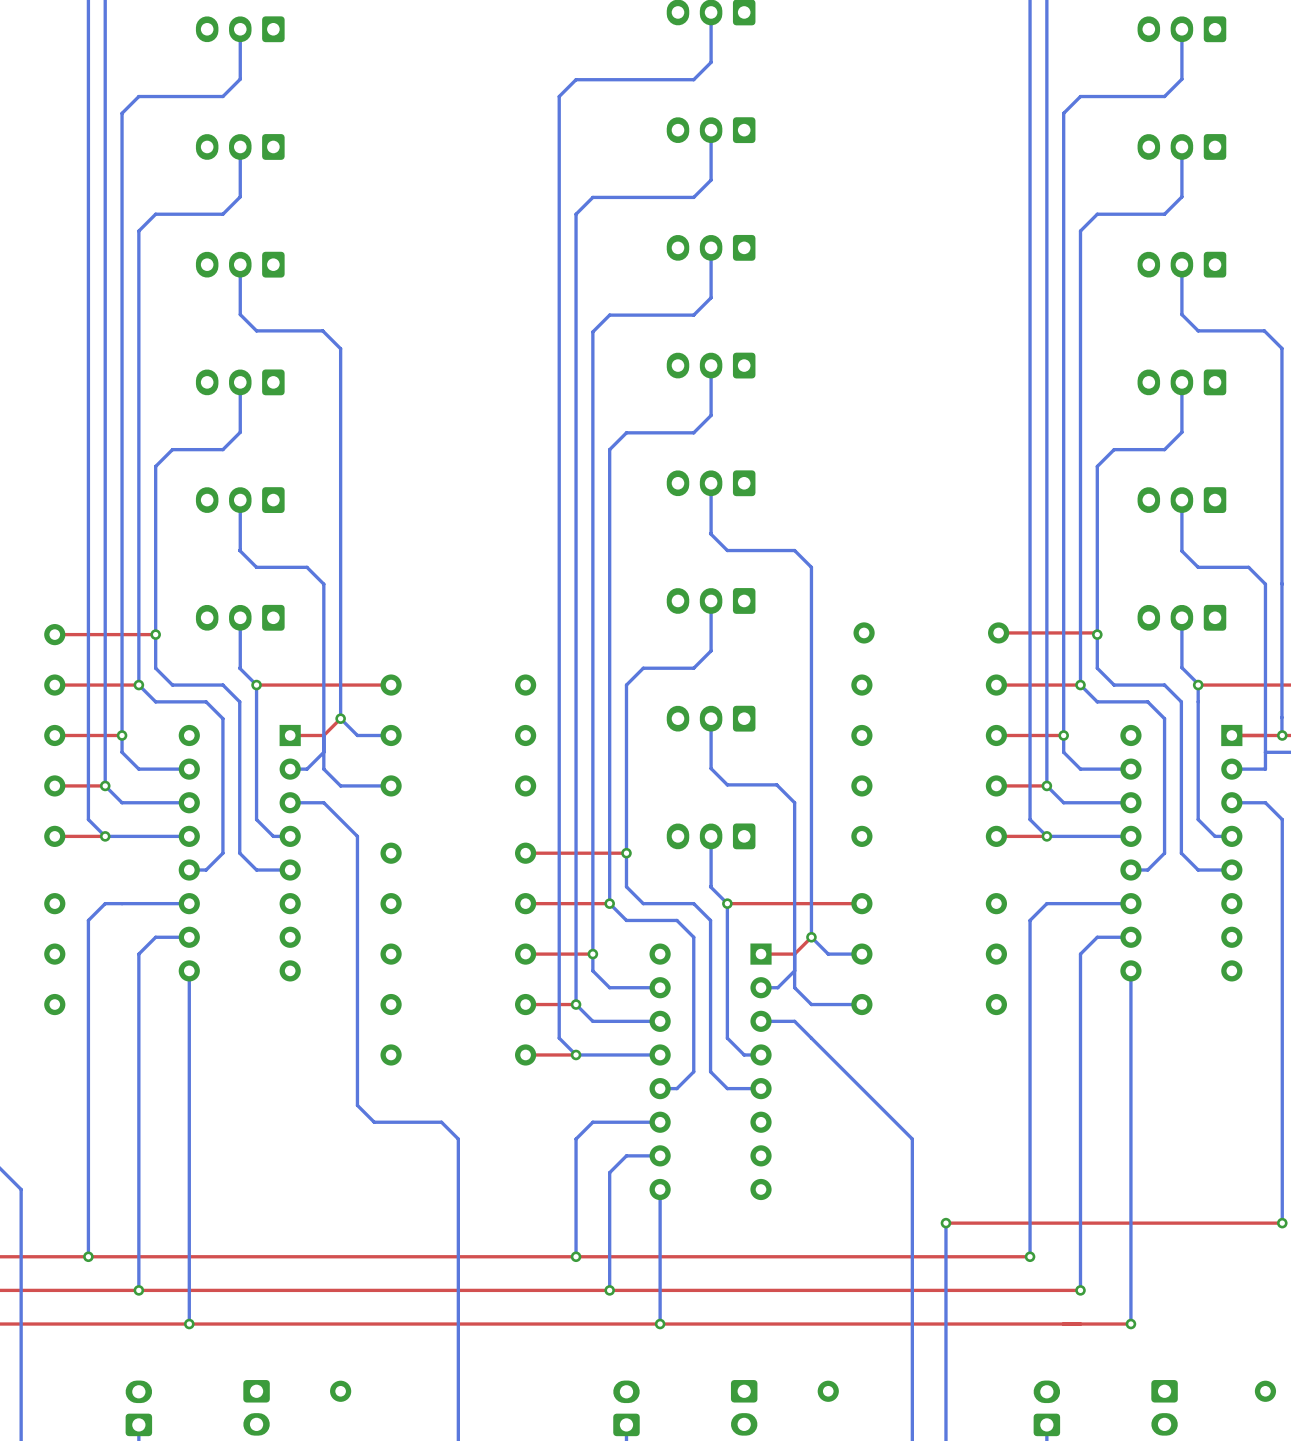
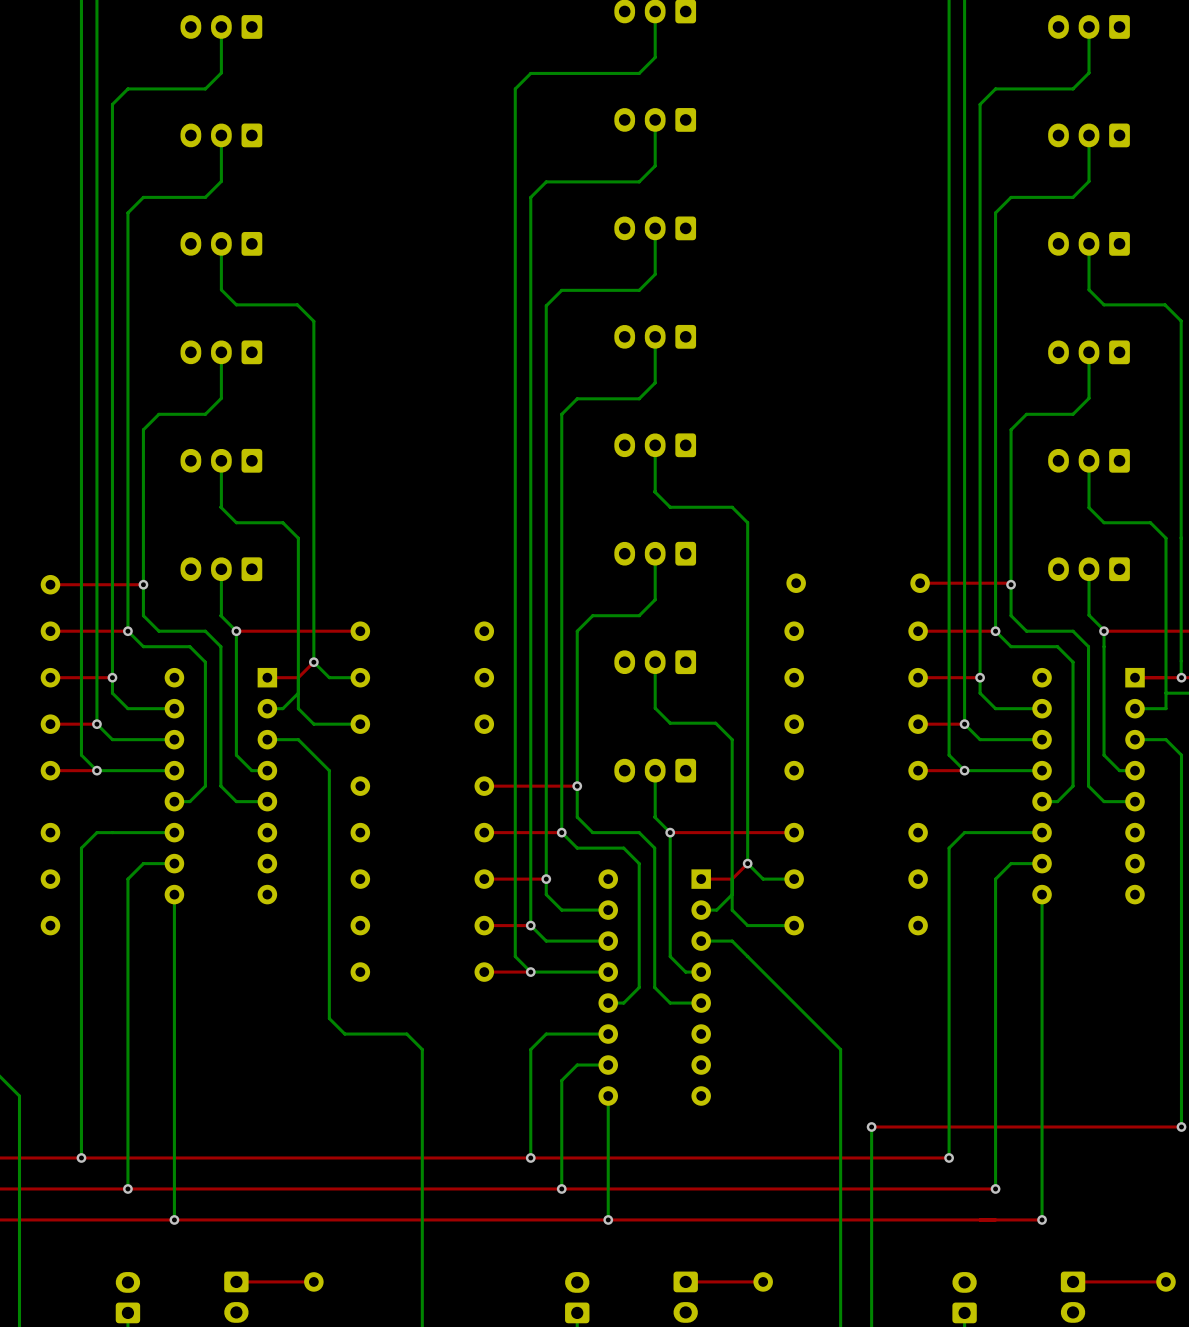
top track: none -> (313, 1281) (236, 1281)
top track: none -> (763, 1281) (685, 1281)
top track: none -> (1166, 1281) (1073, 1281)

